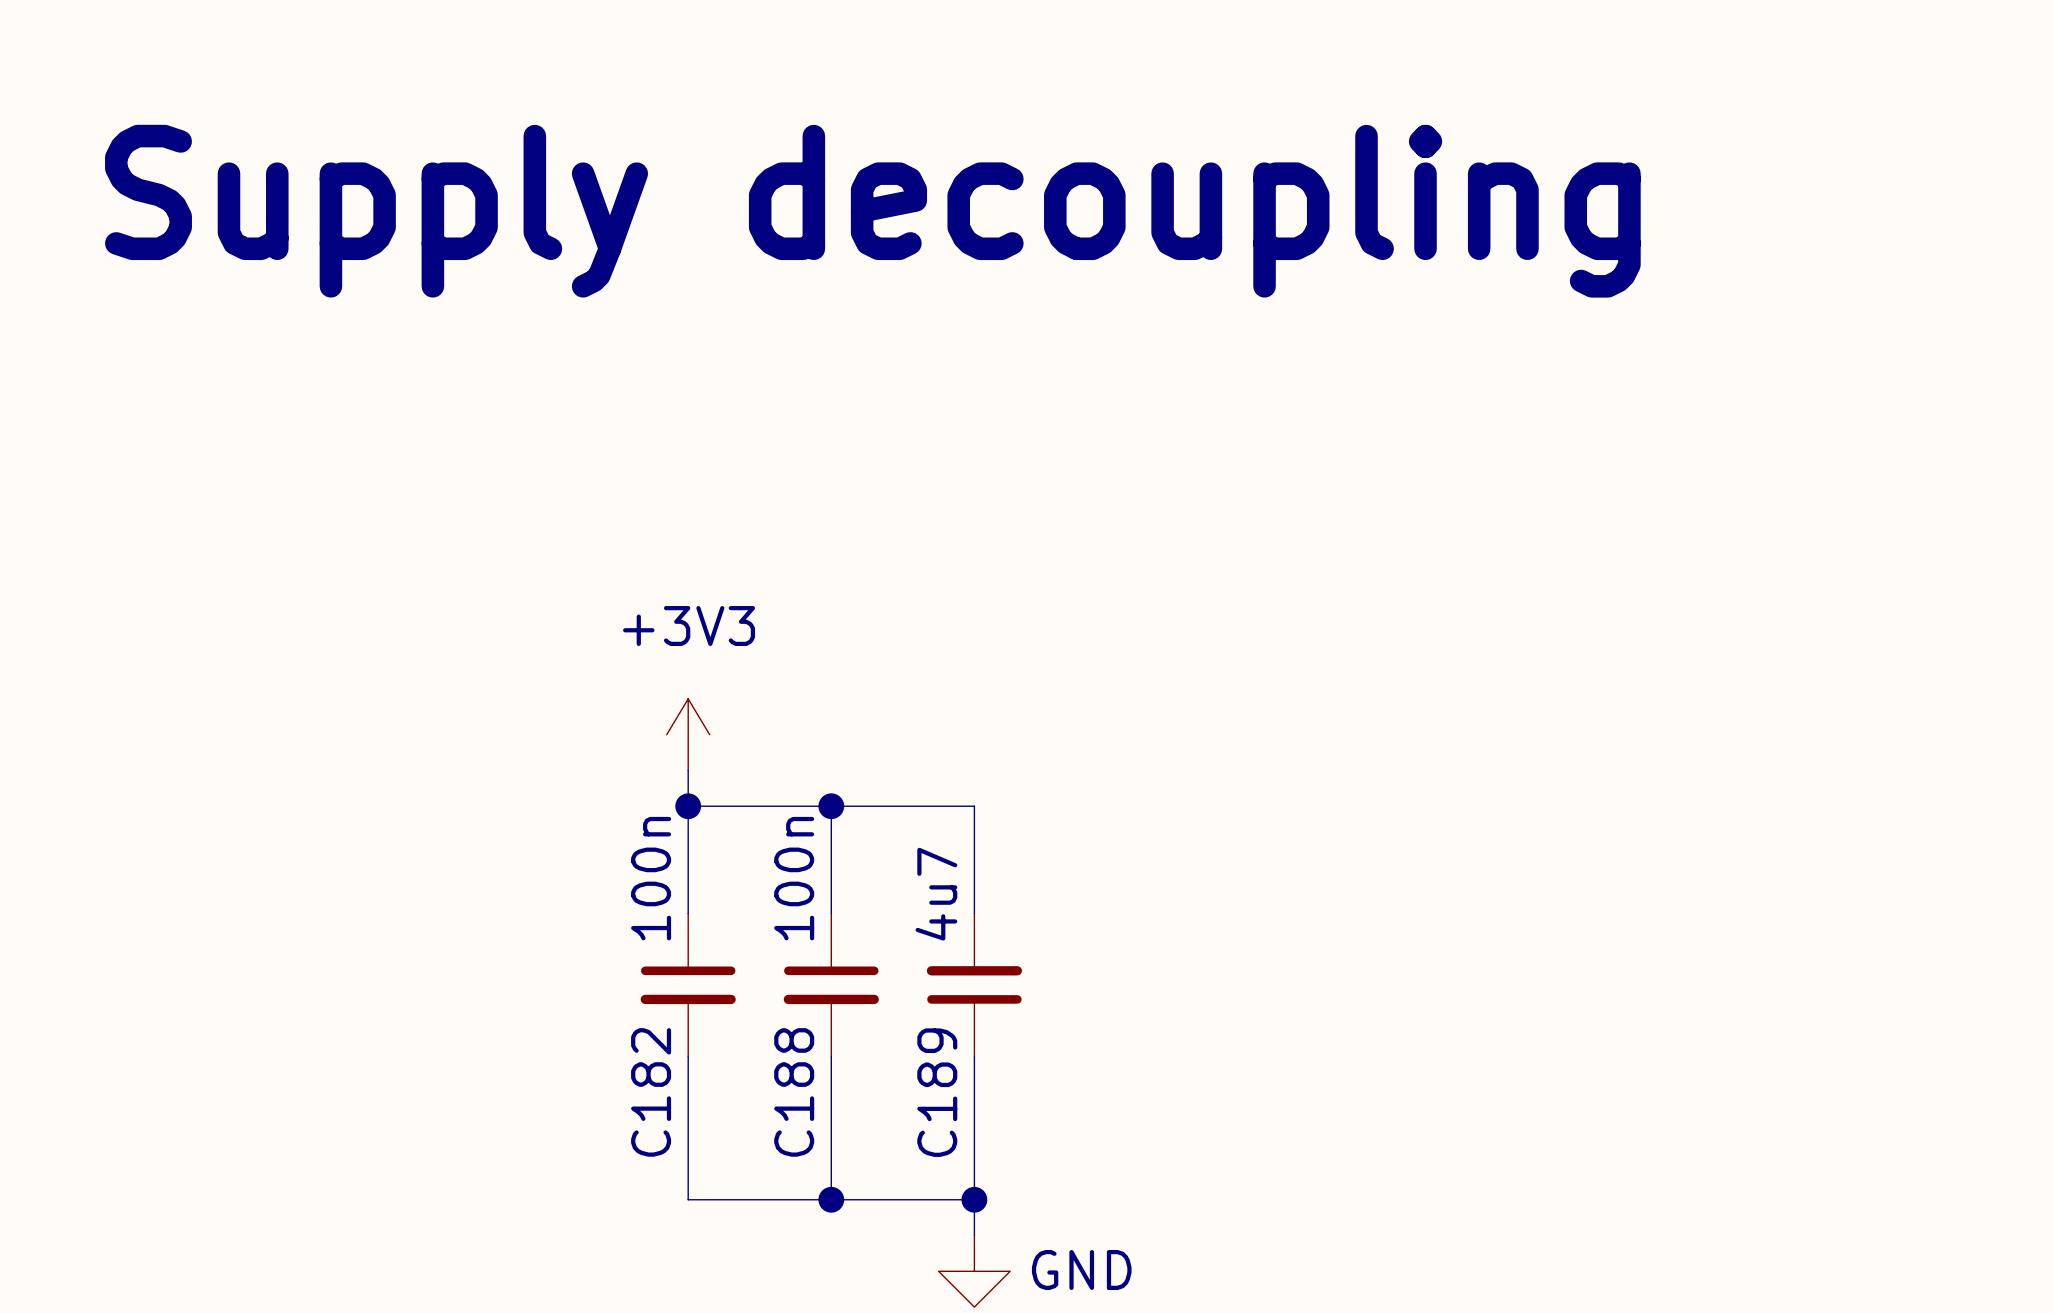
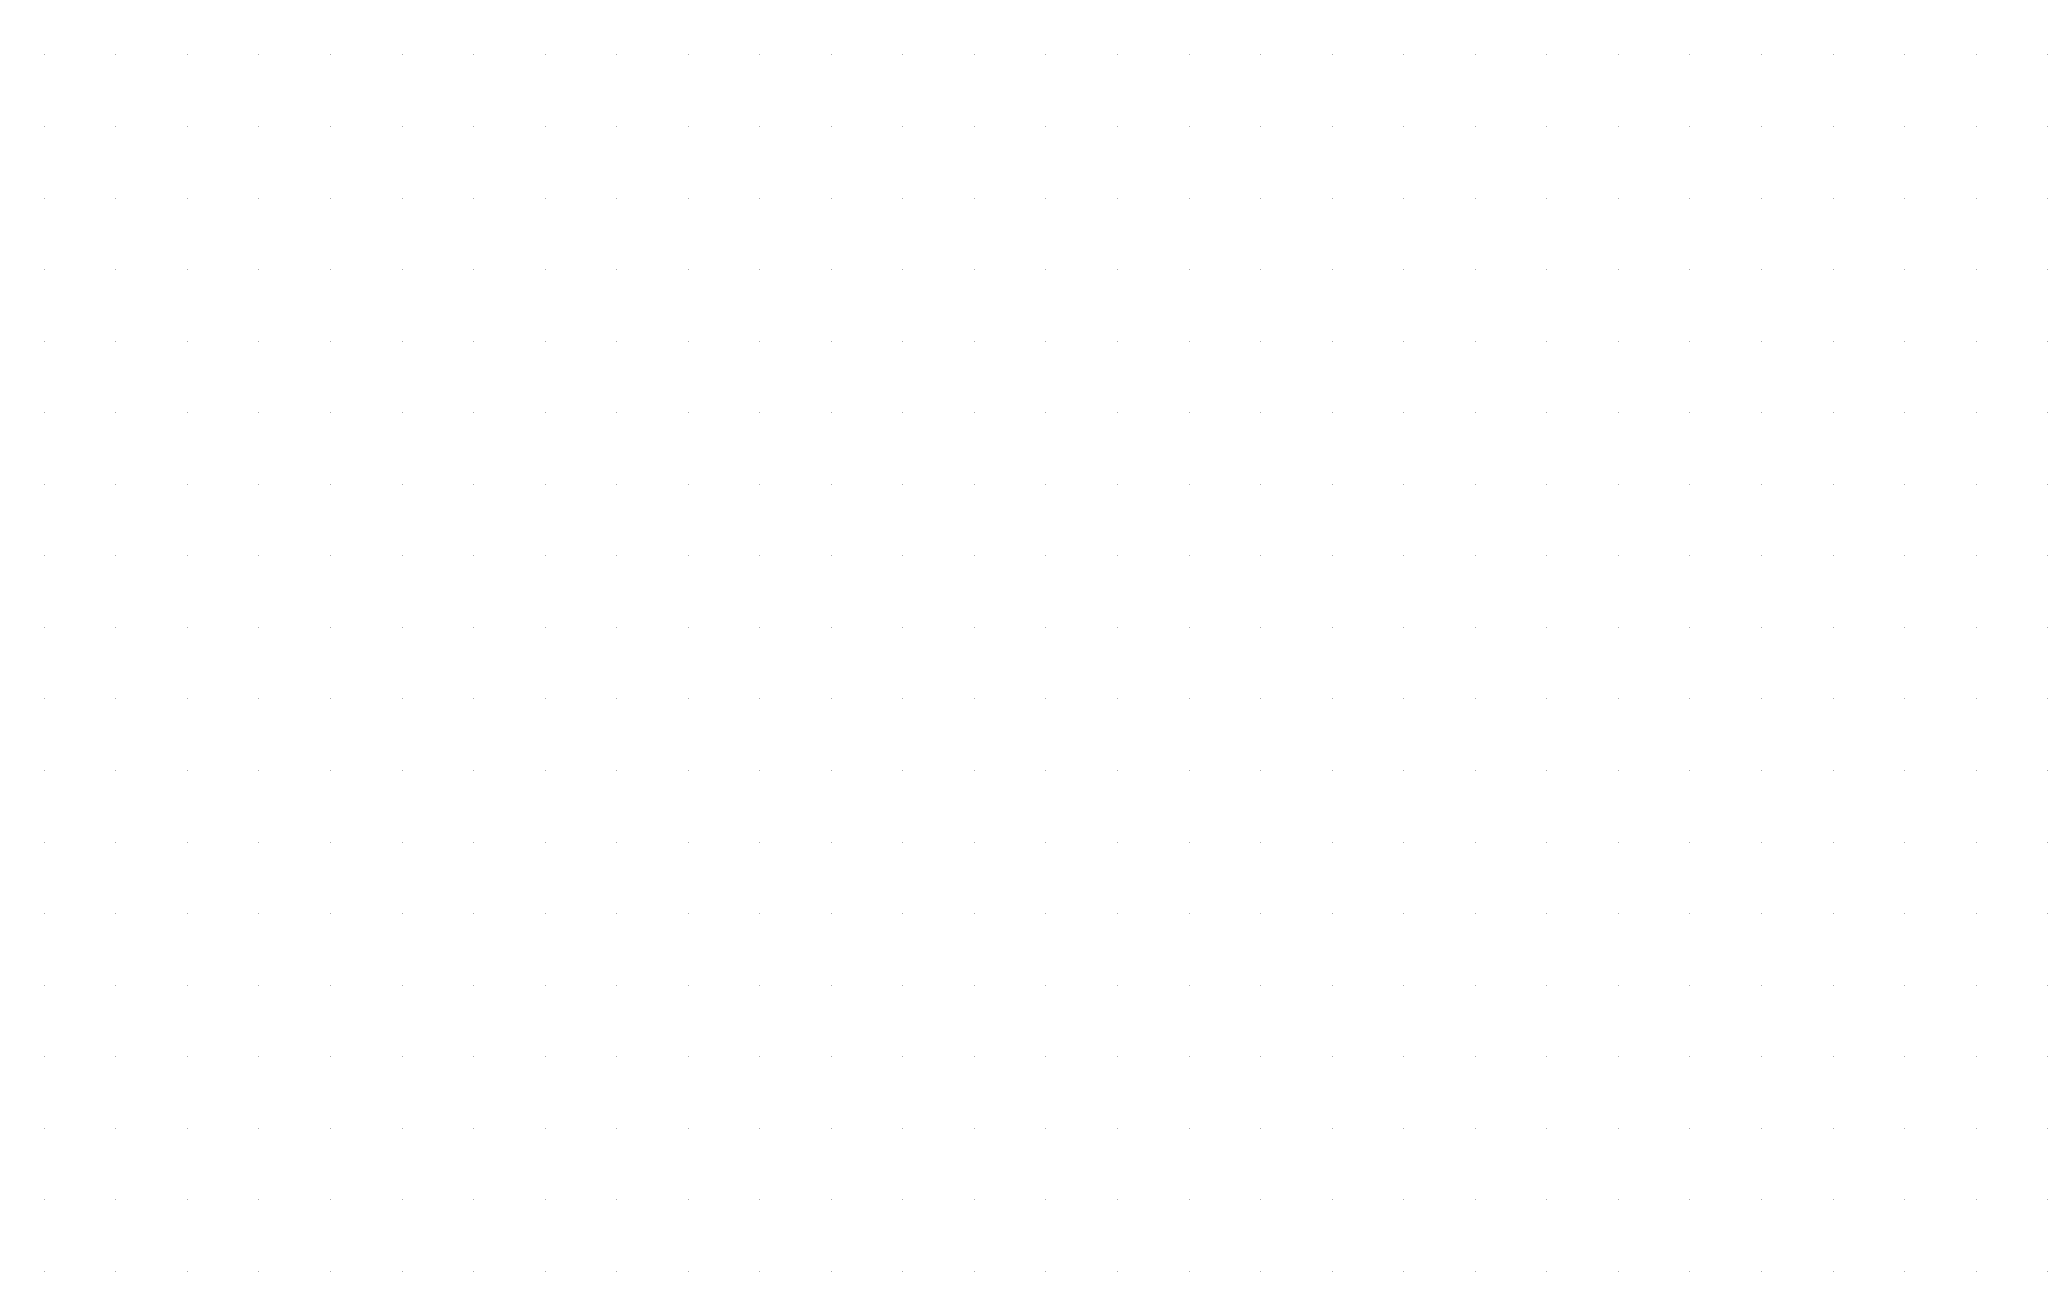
text: Supply decoupling (872, 211) -> none
power symbol: +3V3 (688, 734) -> none
wire: (688, 770) (688, 913) -> none
wire: (688, 806) (974, 806) (974, 913) -> none
junction: (688, 806) -> none
wire: (831, 806) (831, 913) -> none
junction: (831, 806) -> none
C182: (688, 985) -> none
C188: (831, 985) -> none
C189: (974, 985) -> none
wire: (688, 1056) (688, 1199) (974, 1199) -> none
wire: (831, 1056) (831, 1199) -> none
wire: (974, 1056) (974, 1235) -> none
junction: (831, 1199) -> none
junction: (974, 1199) -> none
power symbol: GND (974, 1271) -> none

